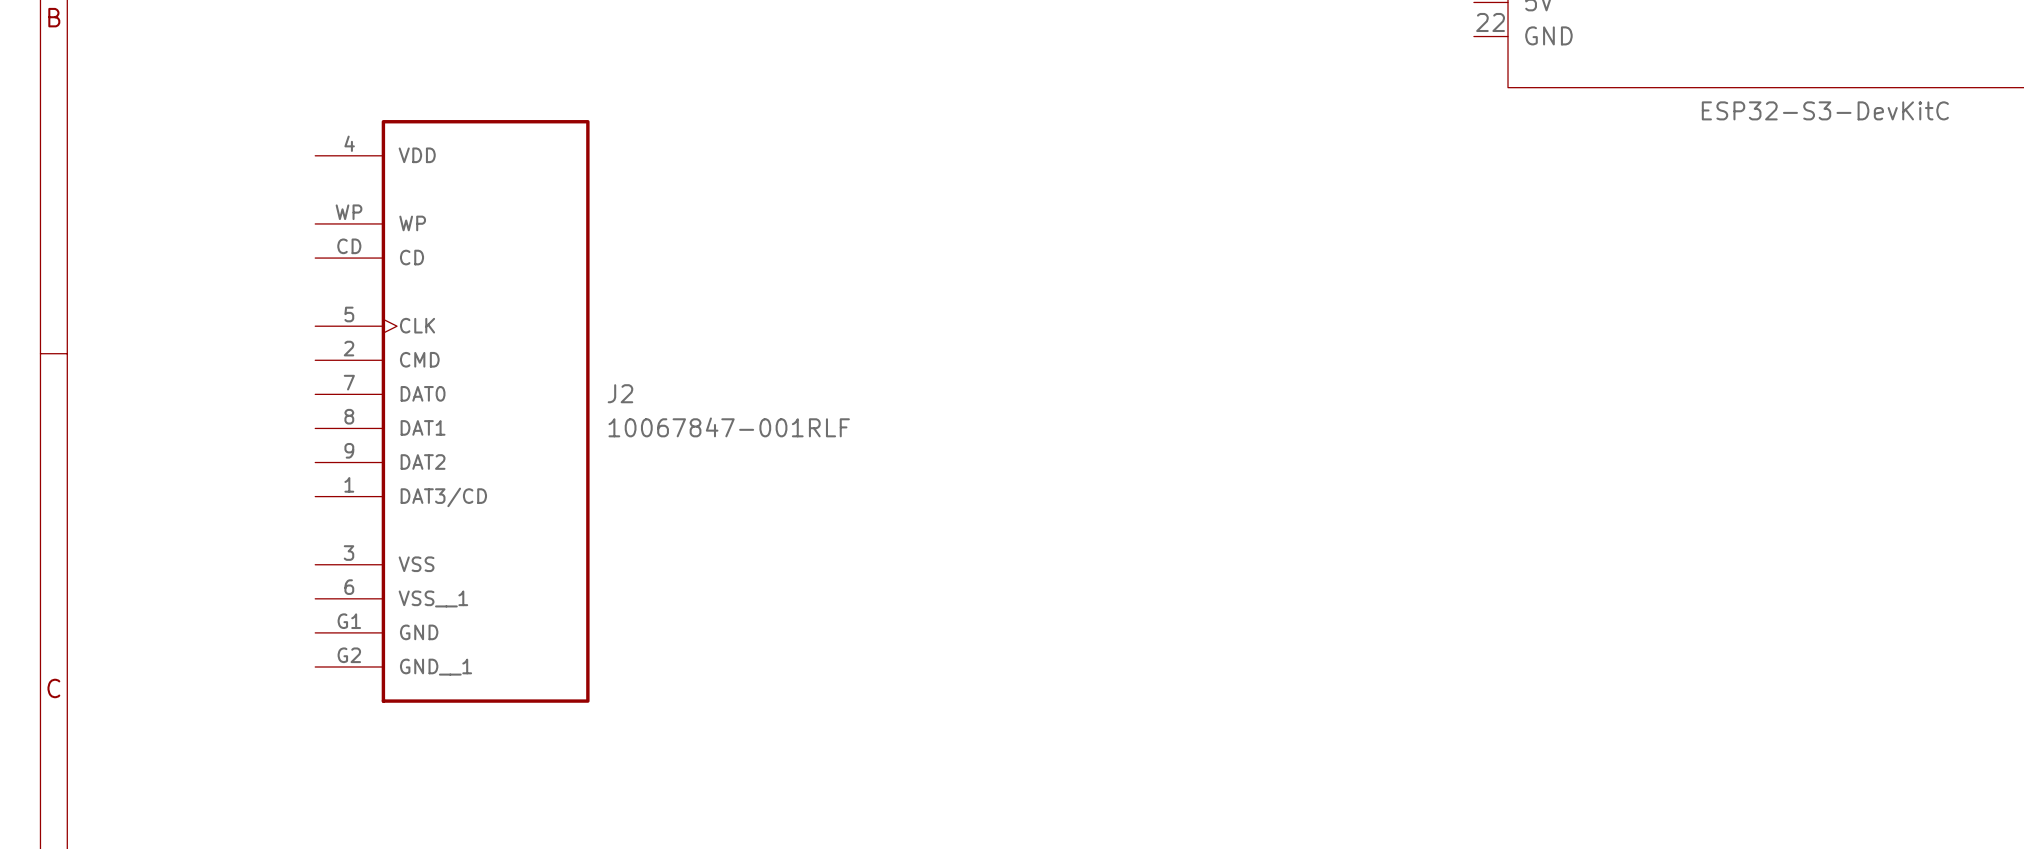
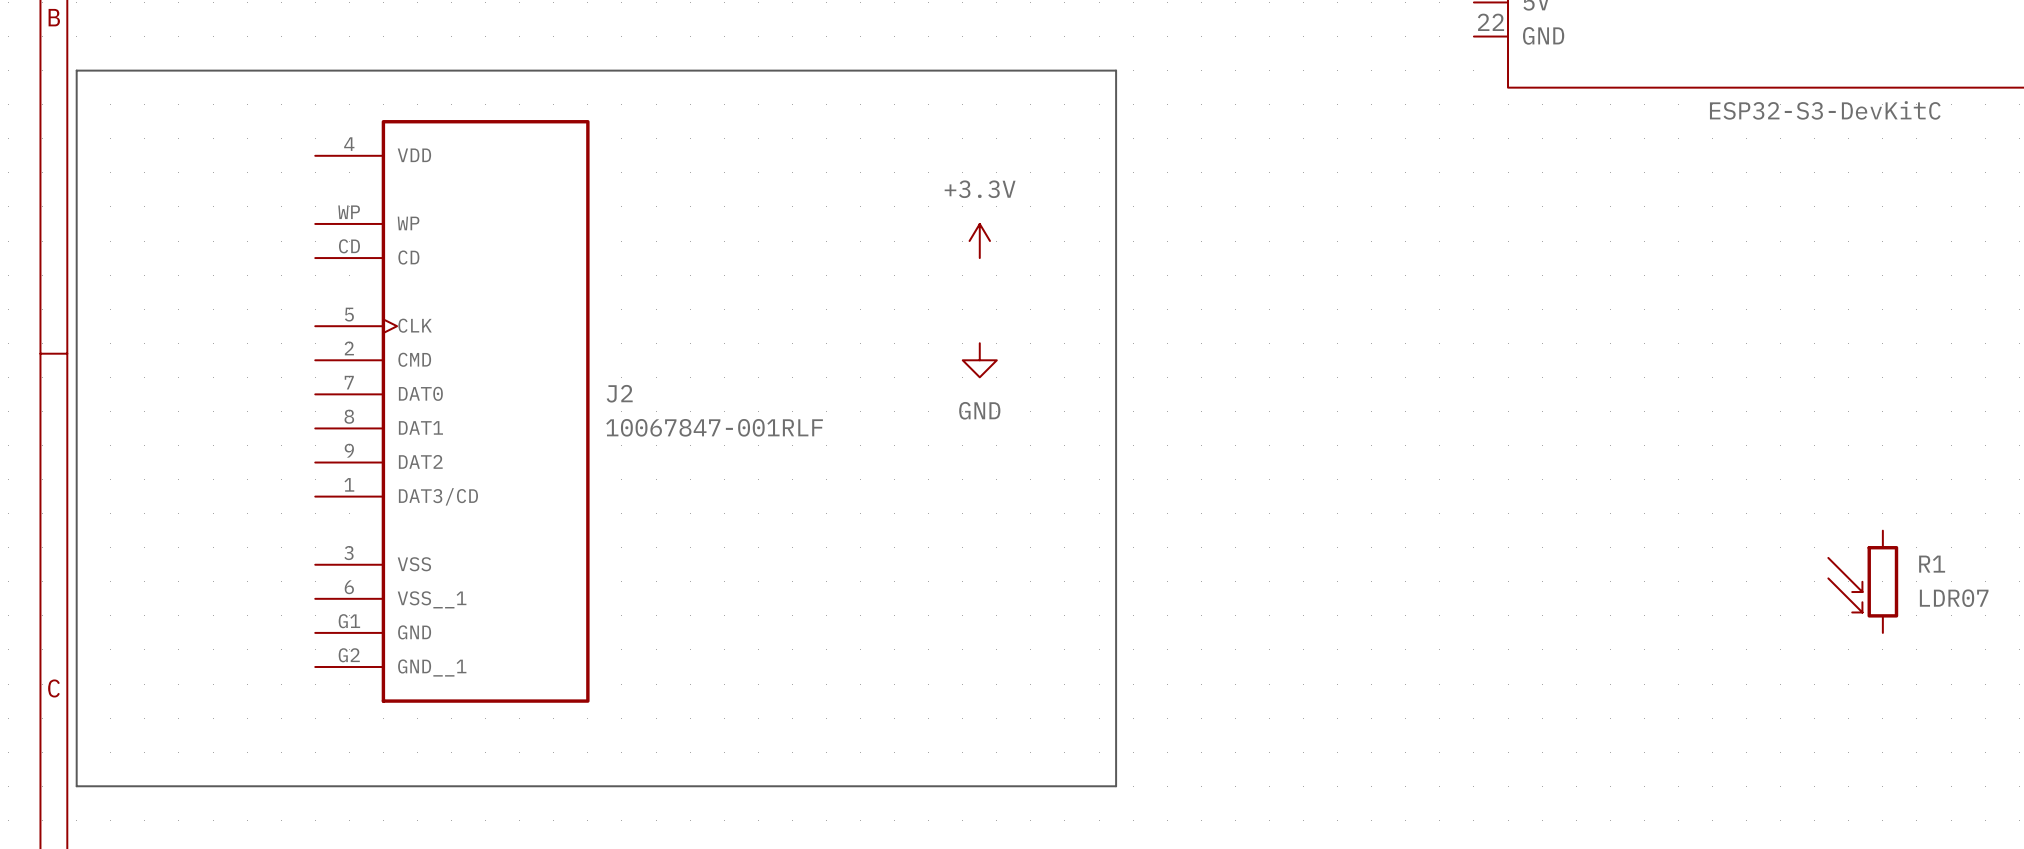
line: none -> (76, 70) (1116, 70) (1116, 786) (76, 786) (76, 70)
power symbol: none -> +3.3V (979, 241)
power symbol: none -> GND (979, 360)
R1: none -> LDR07 (1863, 581)

